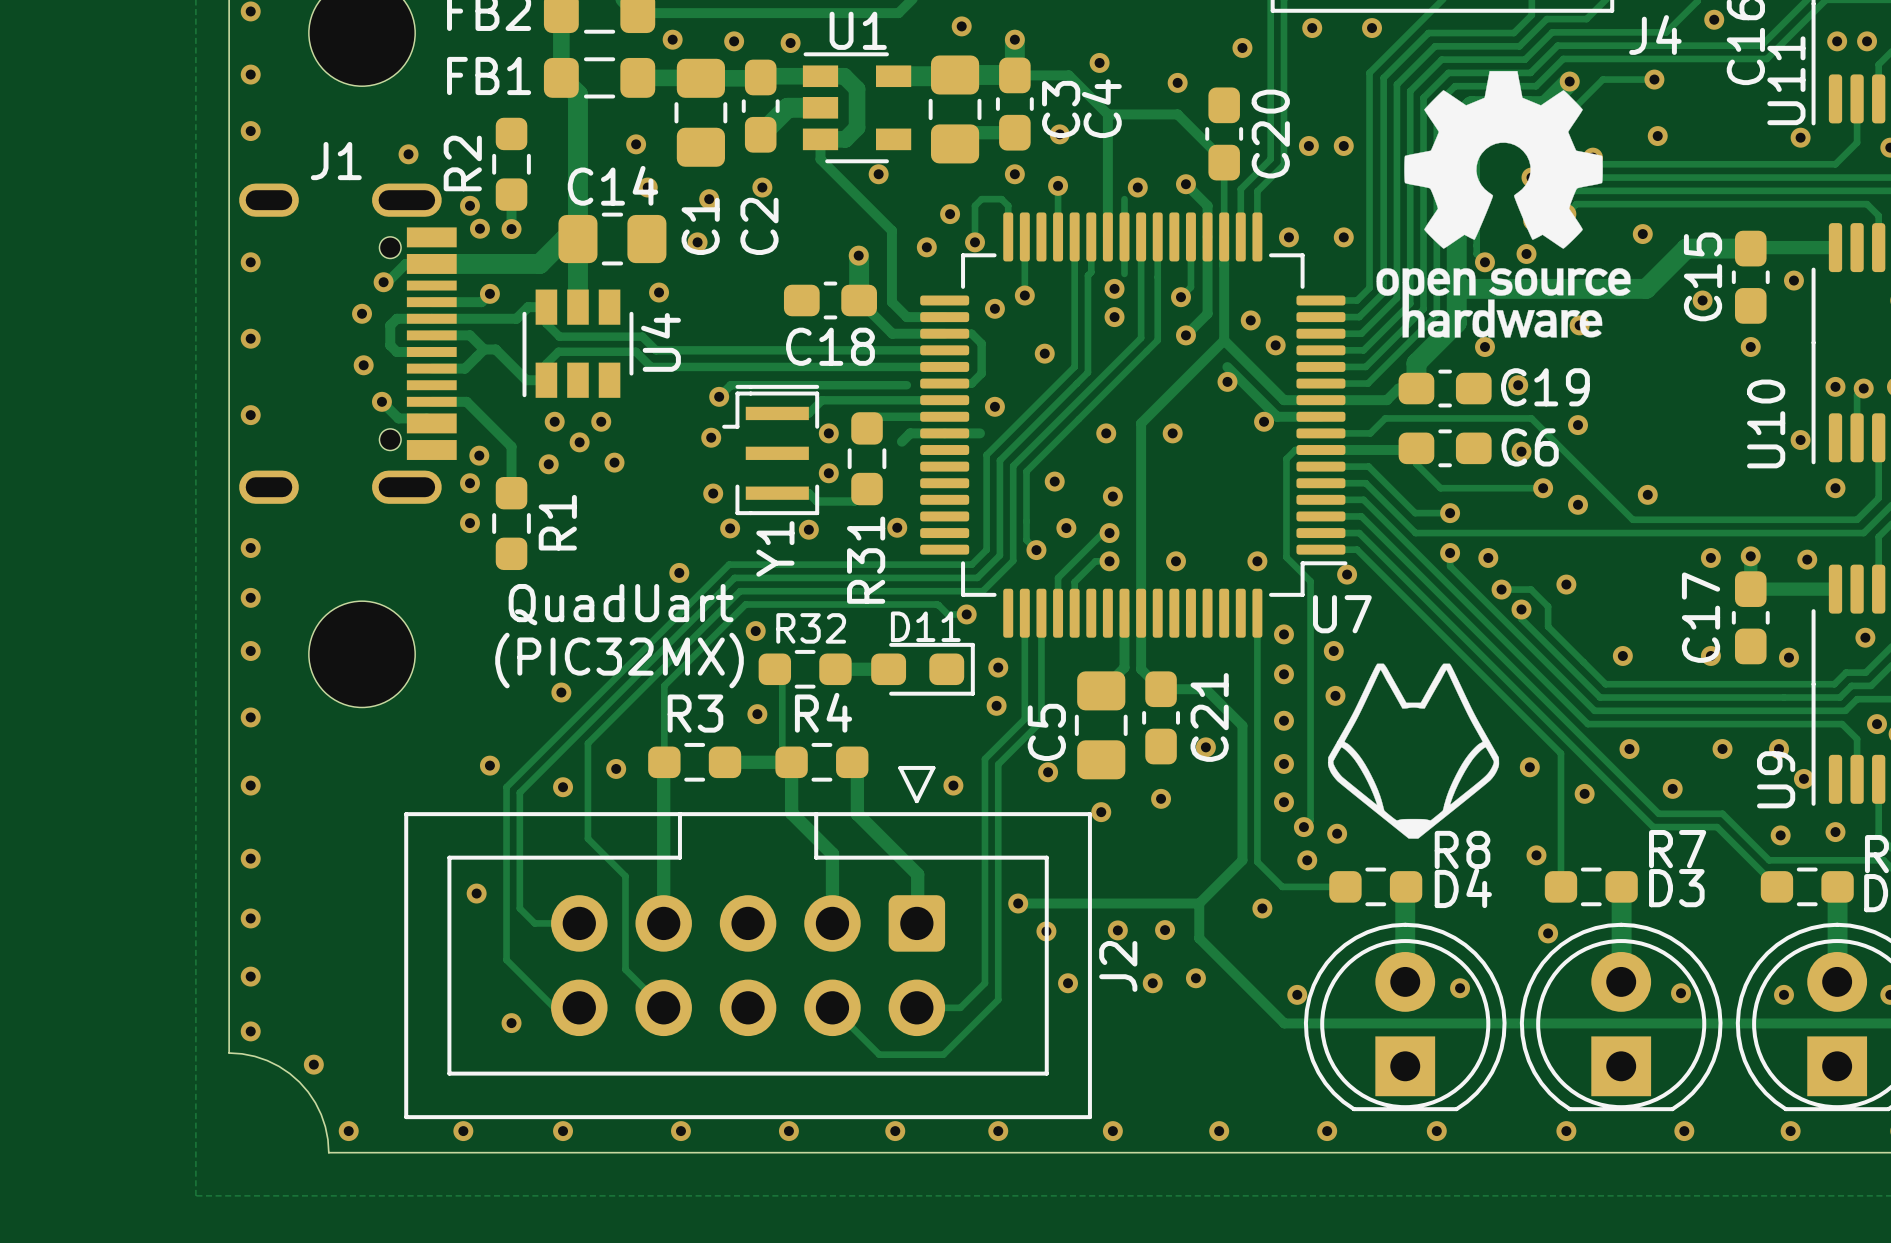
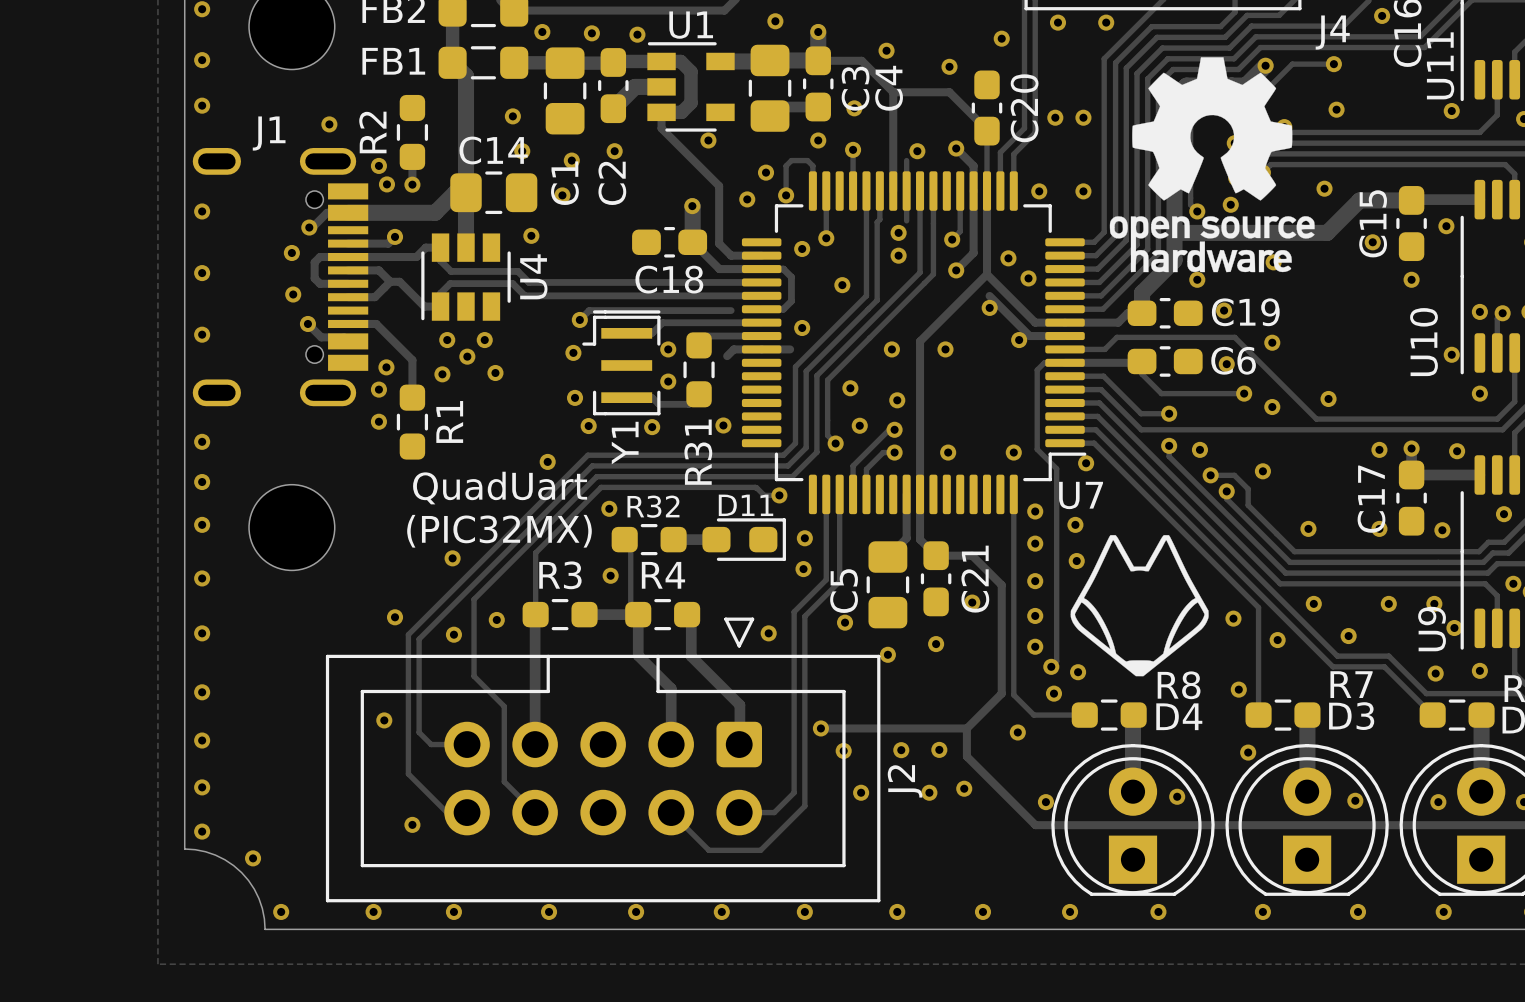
via: (1837, 41) -> none
via: (1867, 41) -> none

